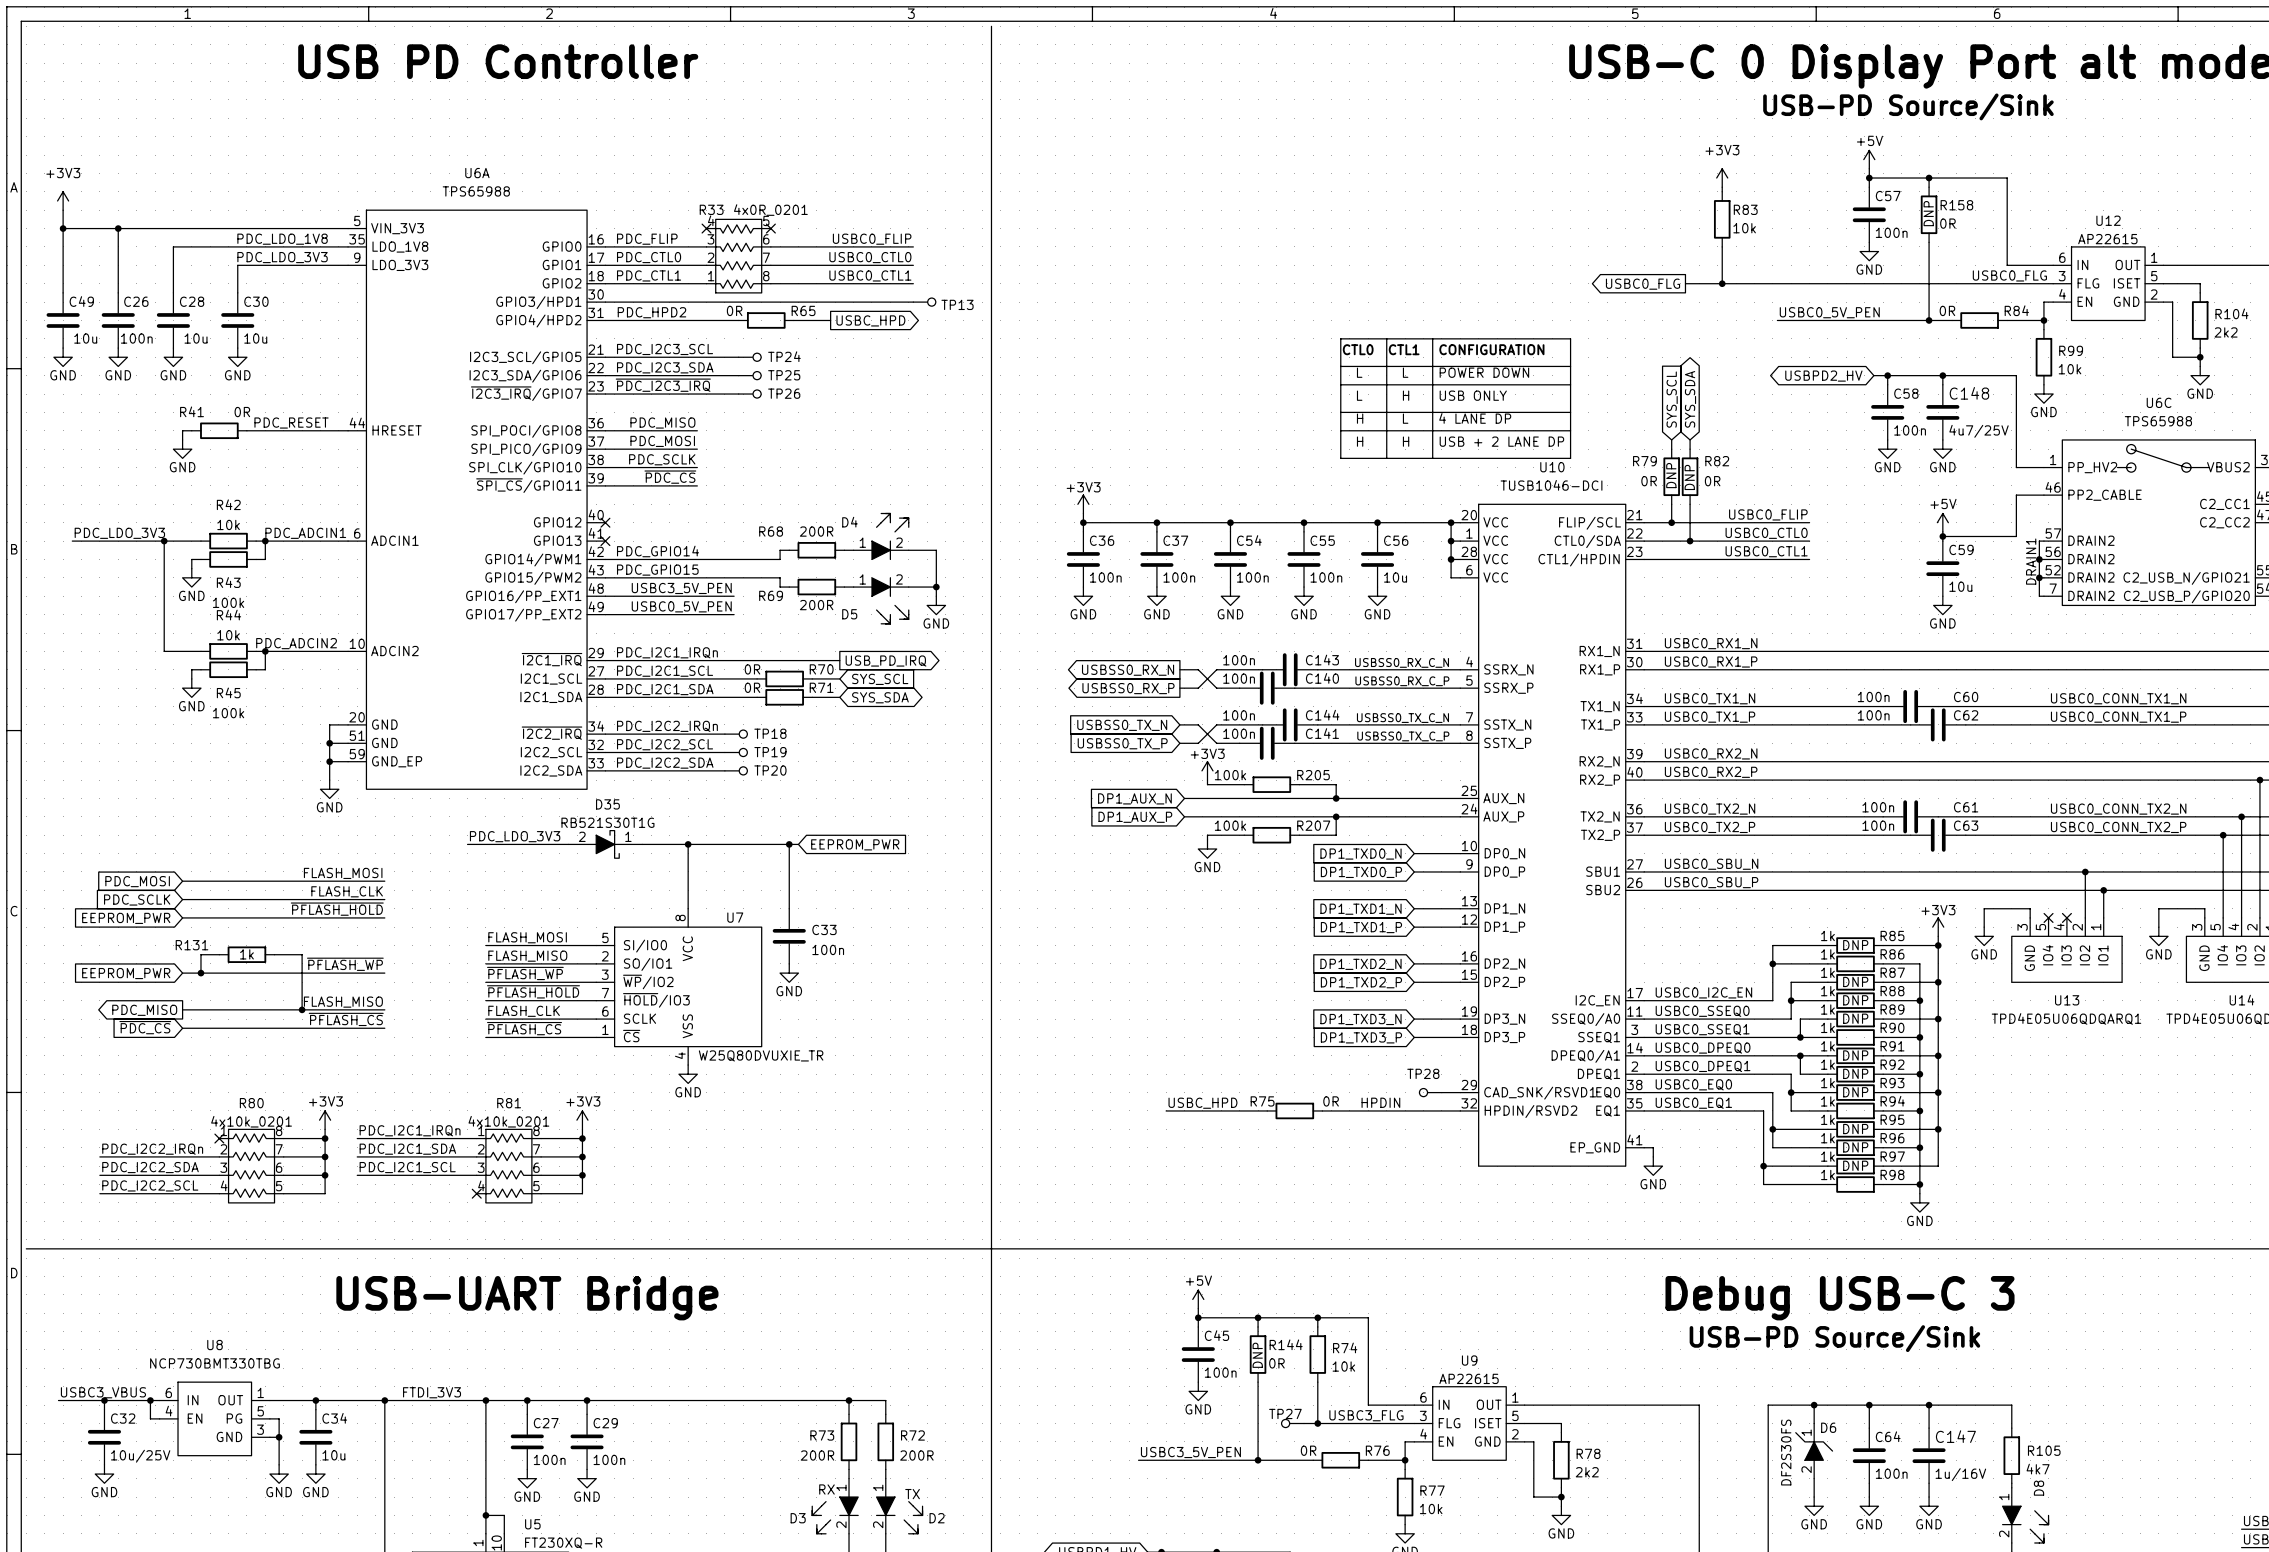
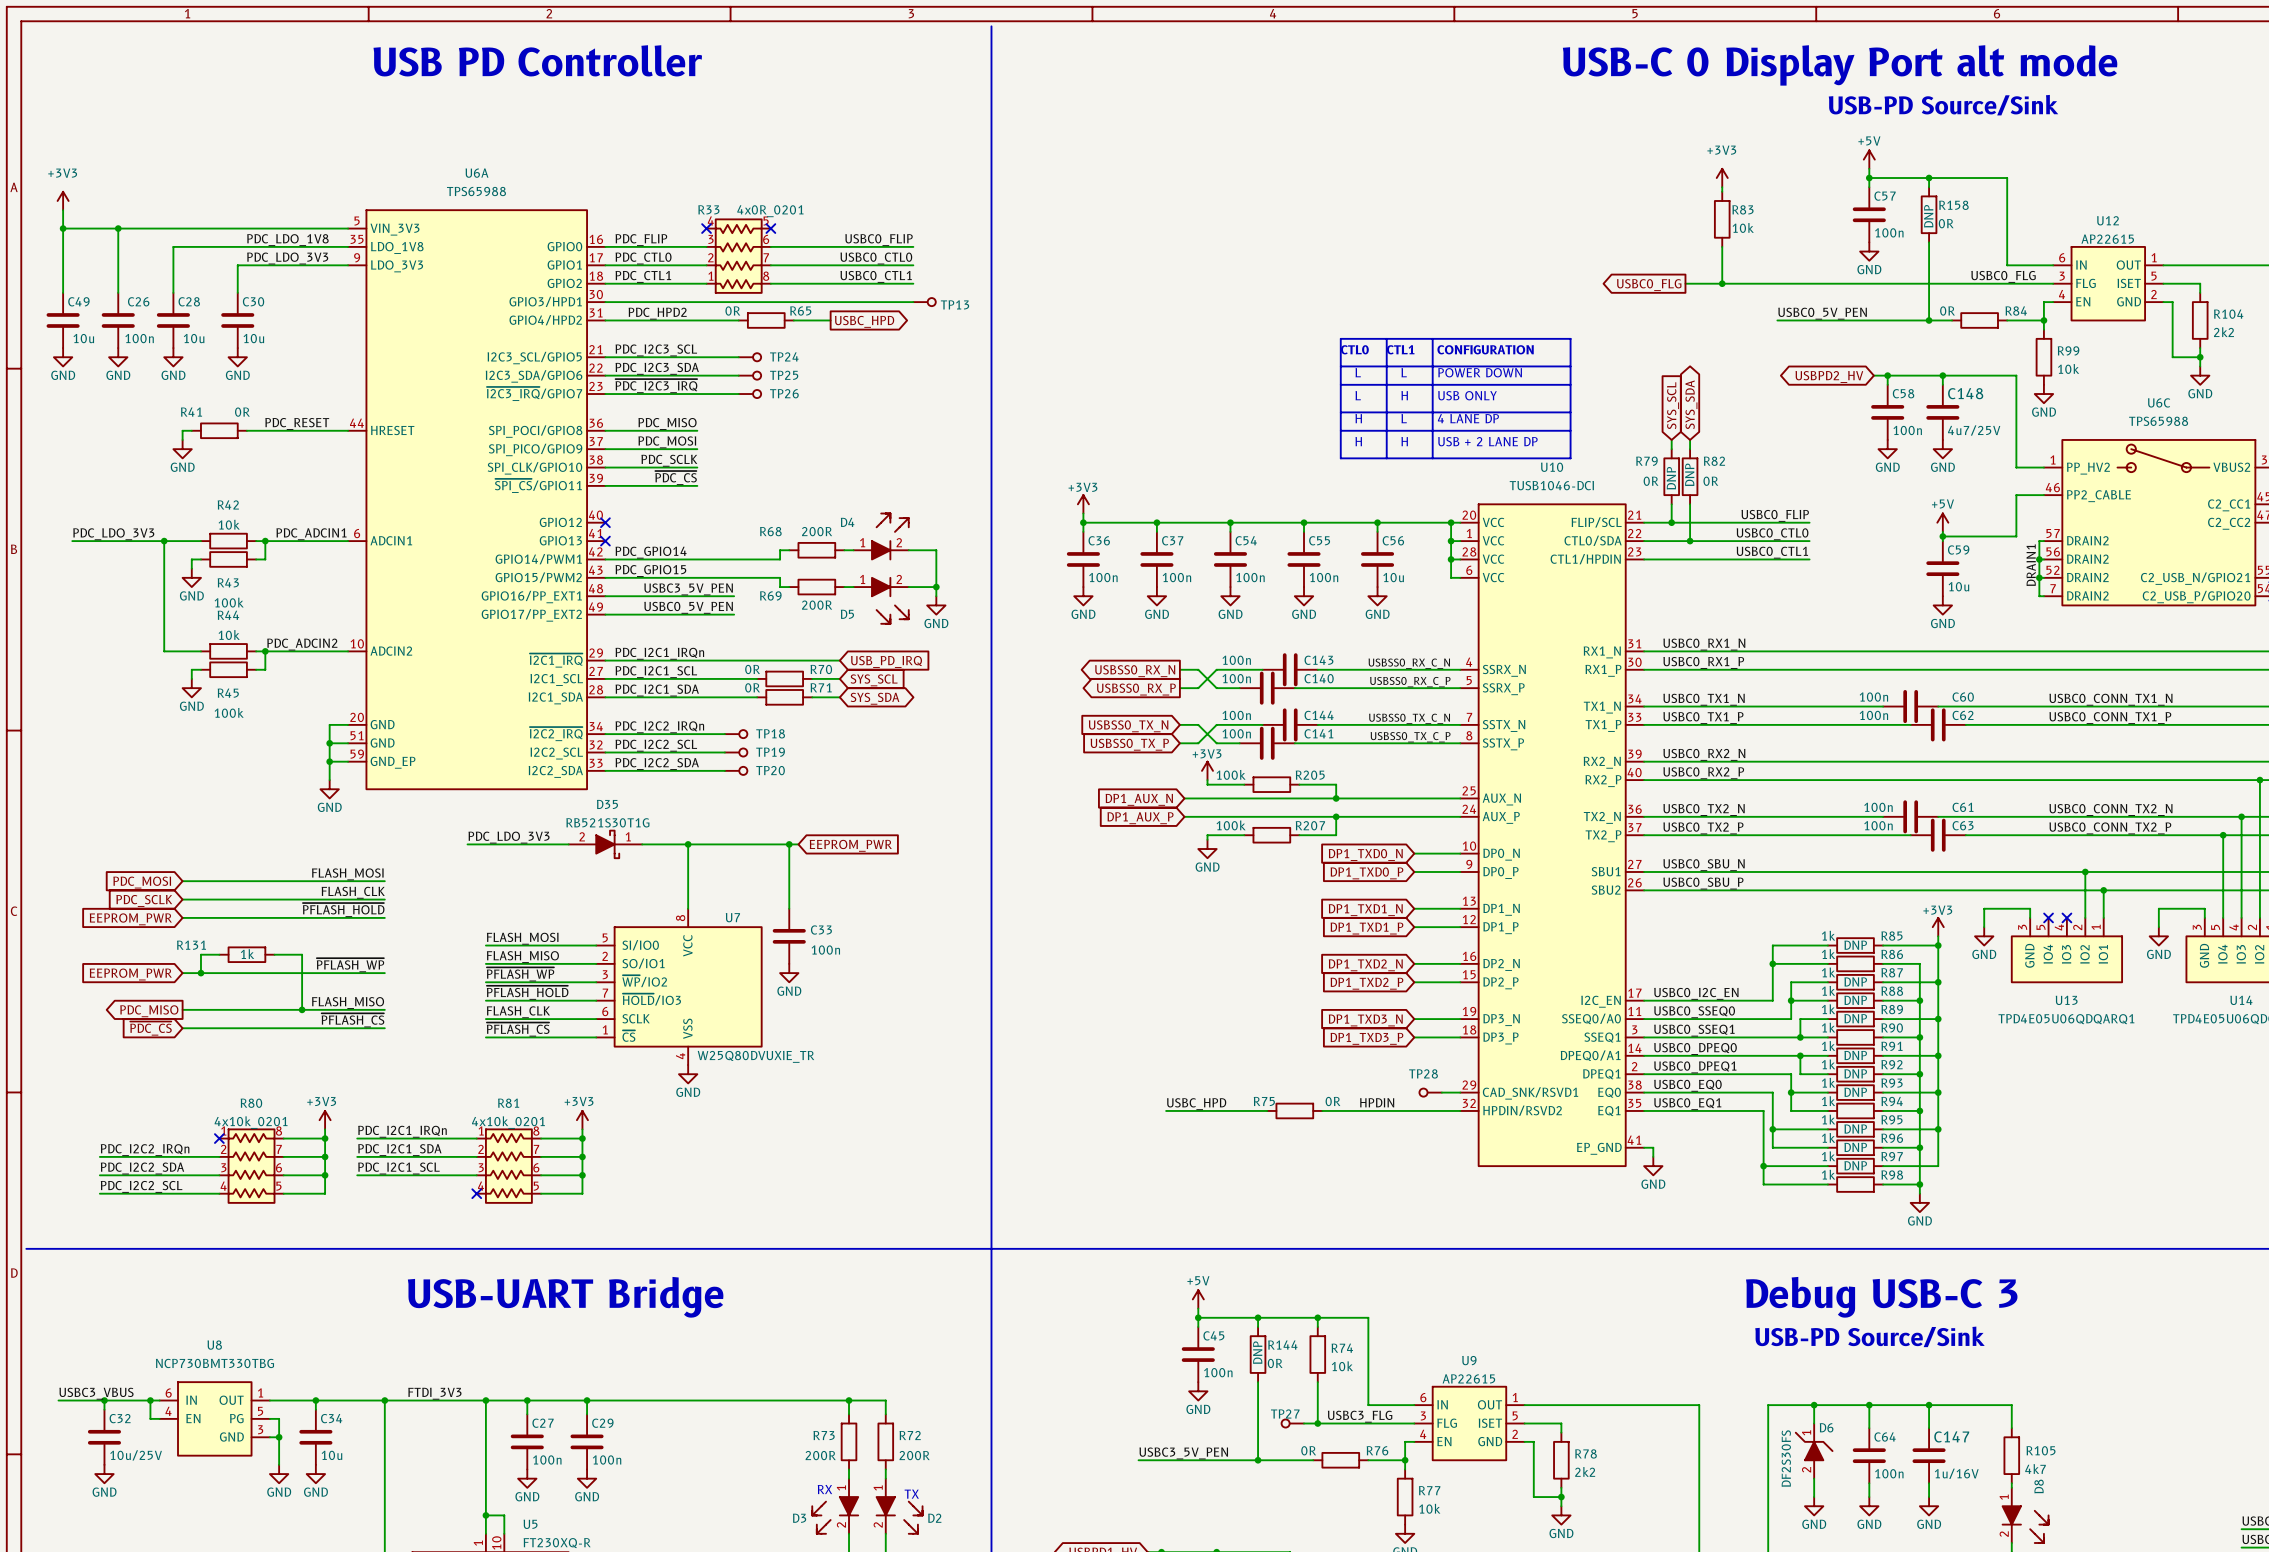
global label shape: output (886, 661) -> input (886, 661)

